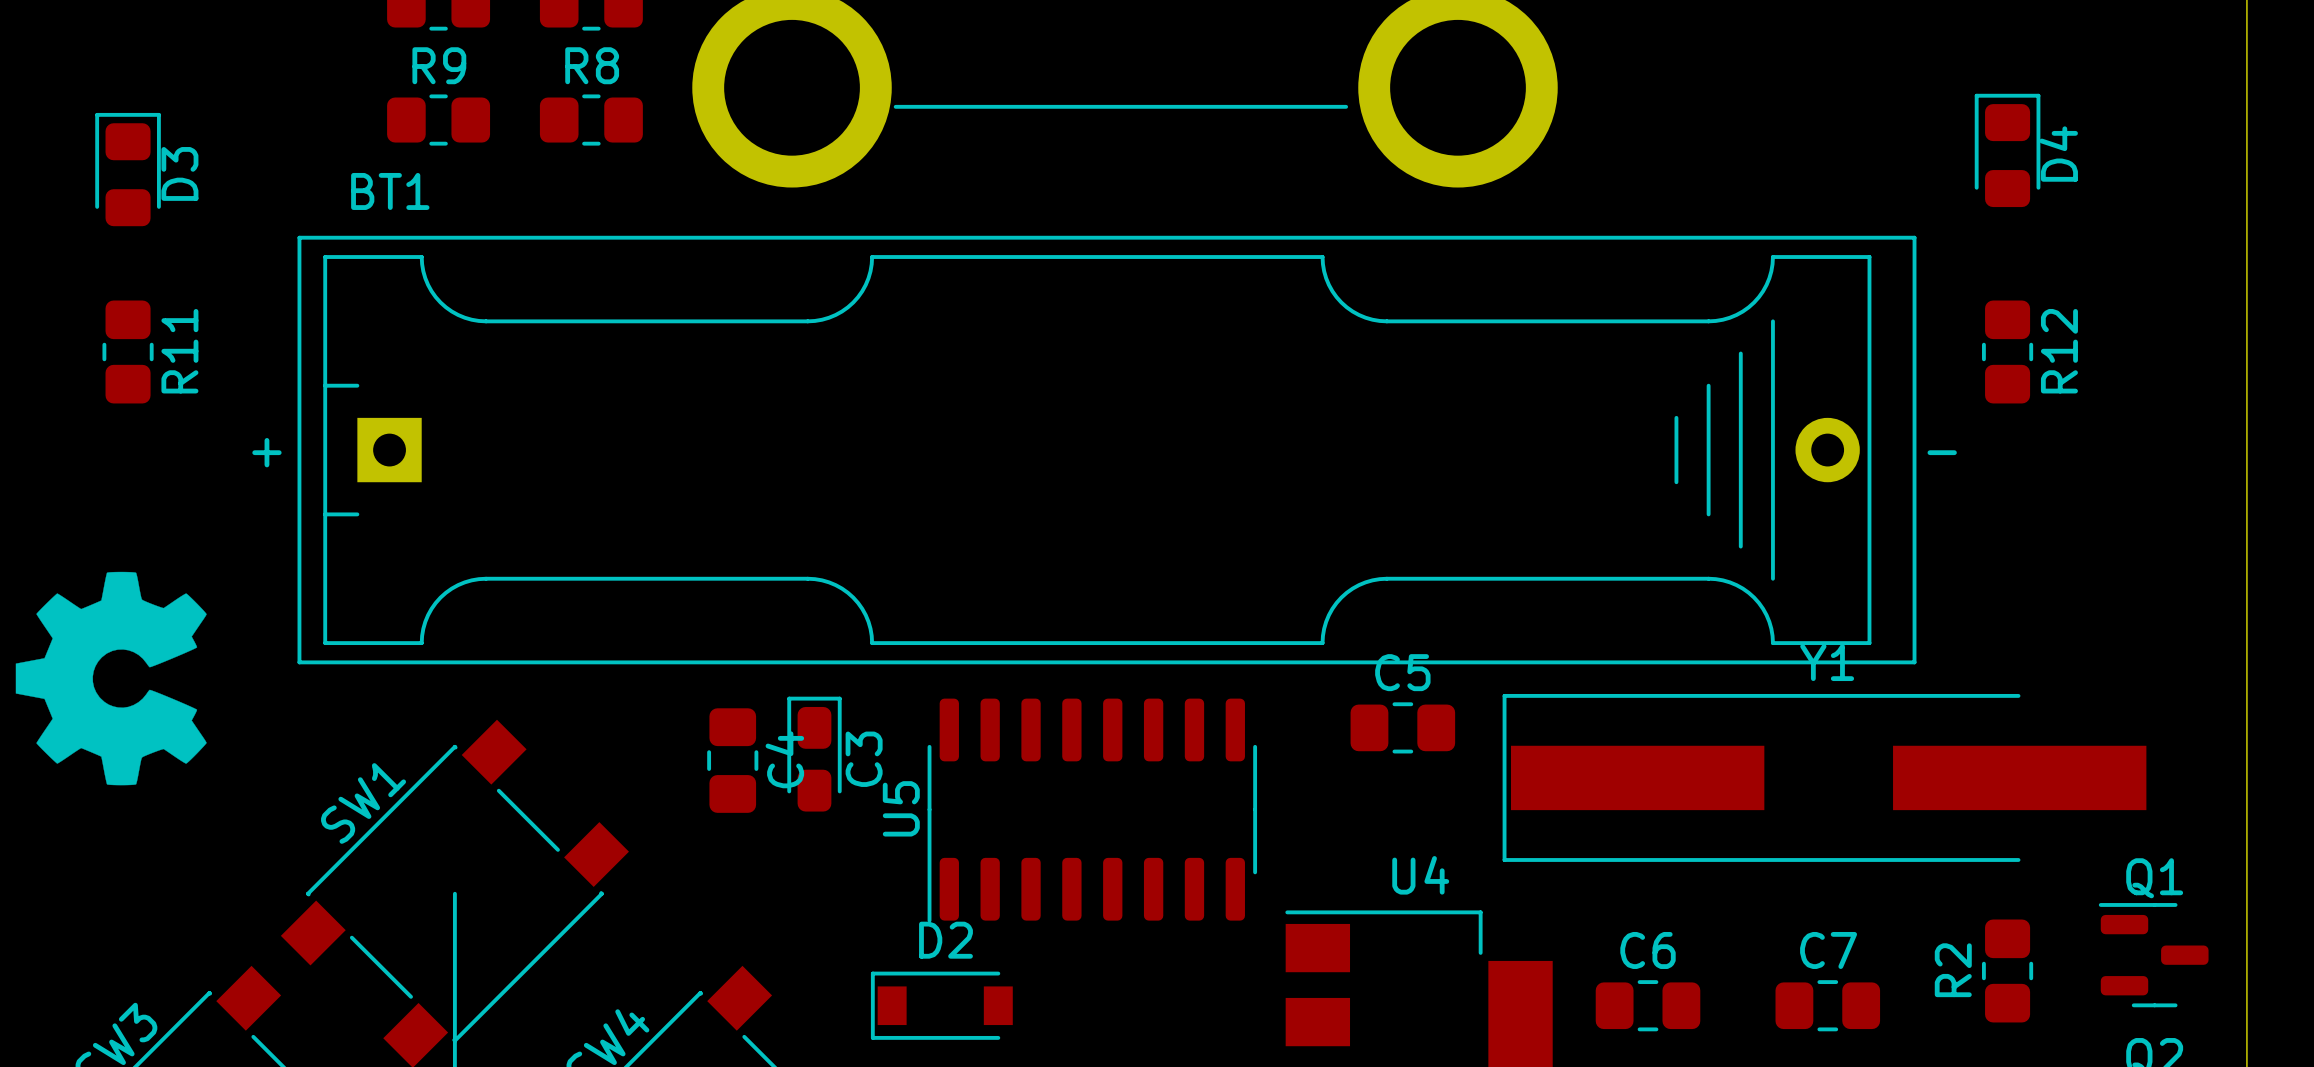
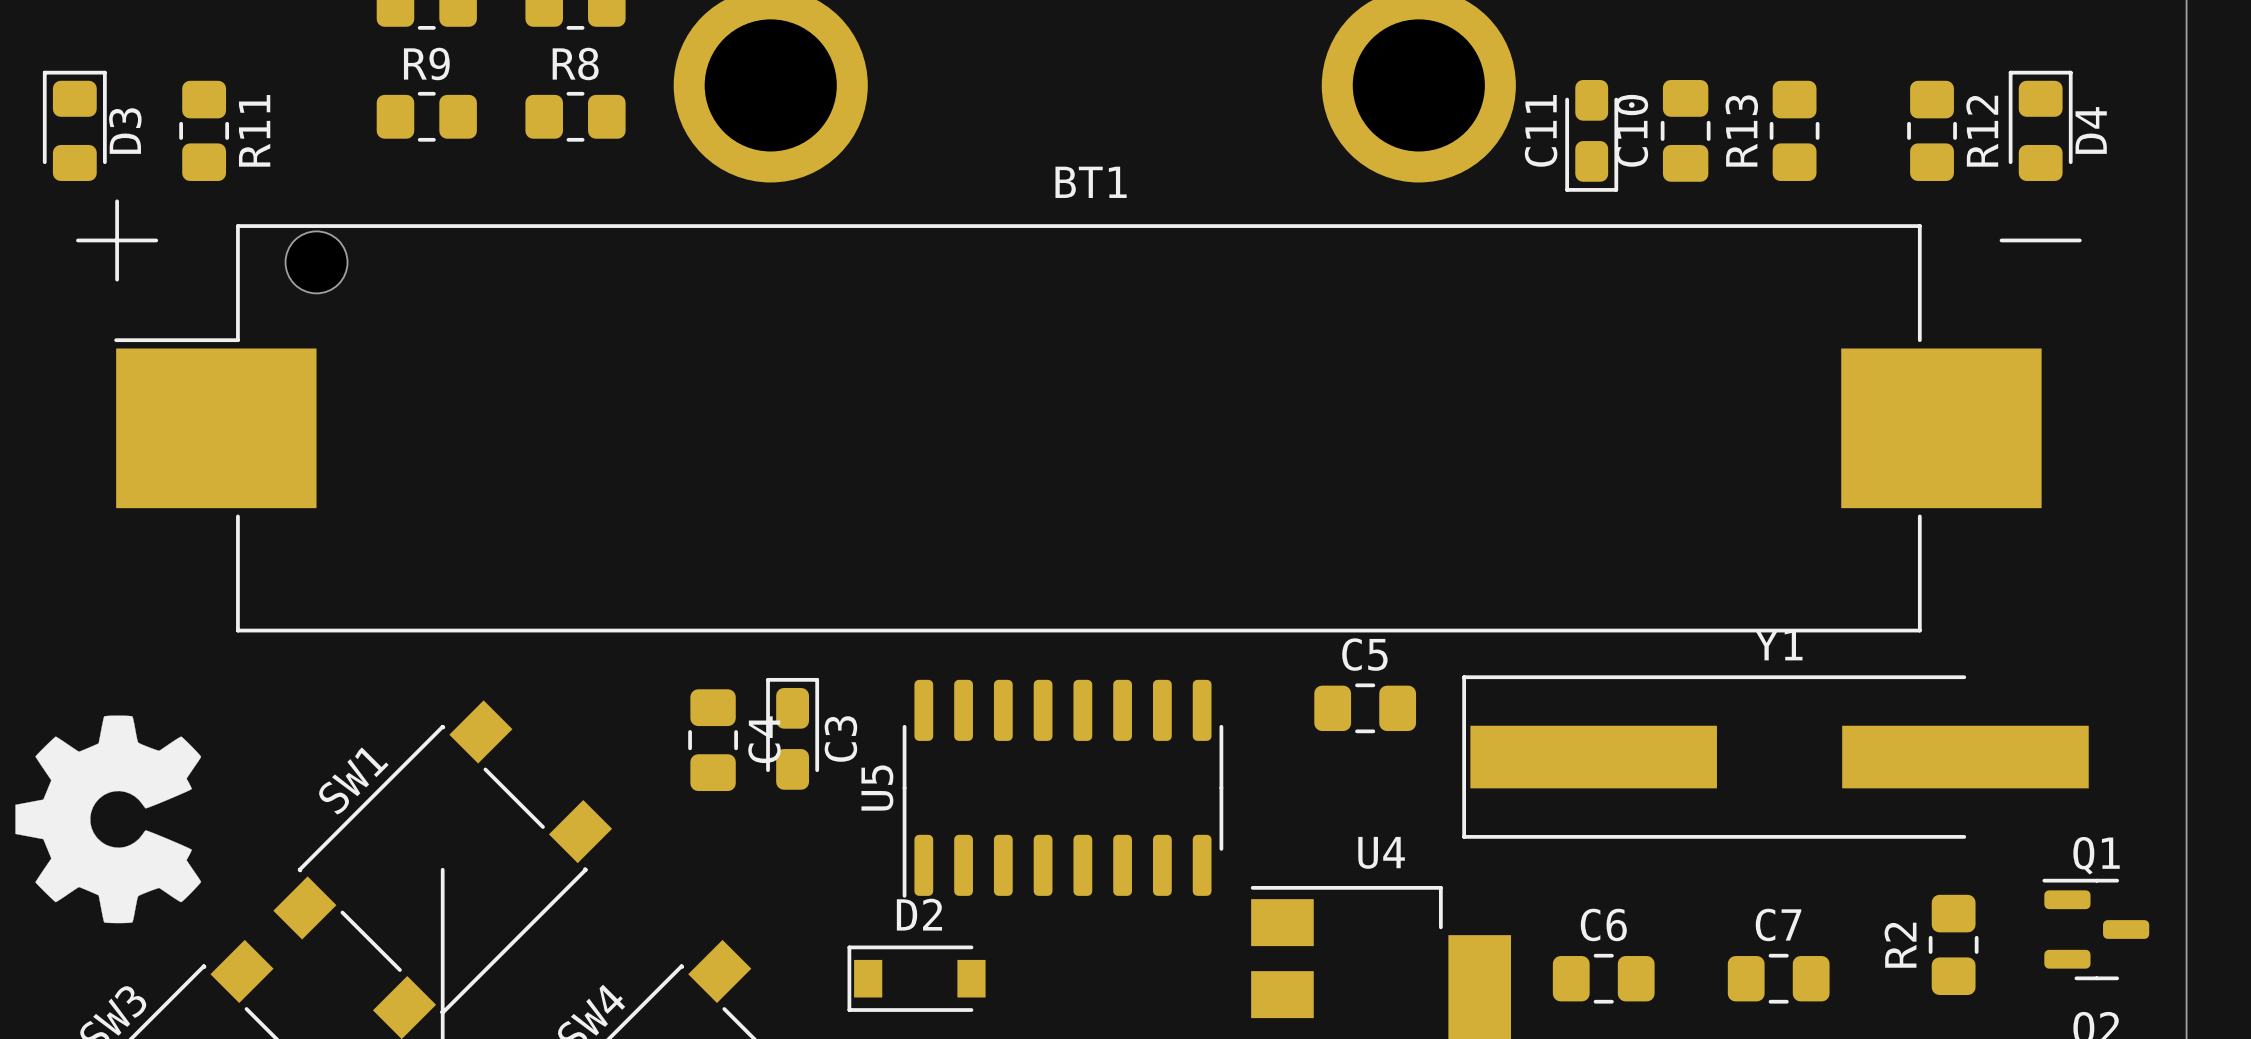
line: (895, 106) (1346, 106) -> none
C10: none -> (1685, 130)
R13: none -> (1794, 130)
C11: none -> (1591, 135)
D4 position: (2007, 150) -> (2040, 125)
D3 position: (128, 169) -> (74, 125)
BT1 name position: BT1 (390, 191) -> BT1 (1091, 182)
BT1 footprint: [297, 235, 1917, 665] -> [76, 199, 2082, 633]
R11 position: (128, 351) -> (204, 130)
R12 position: (2007, 351) -> (1932, 130)
drawing position: (111, 678) -> (108, 819)

